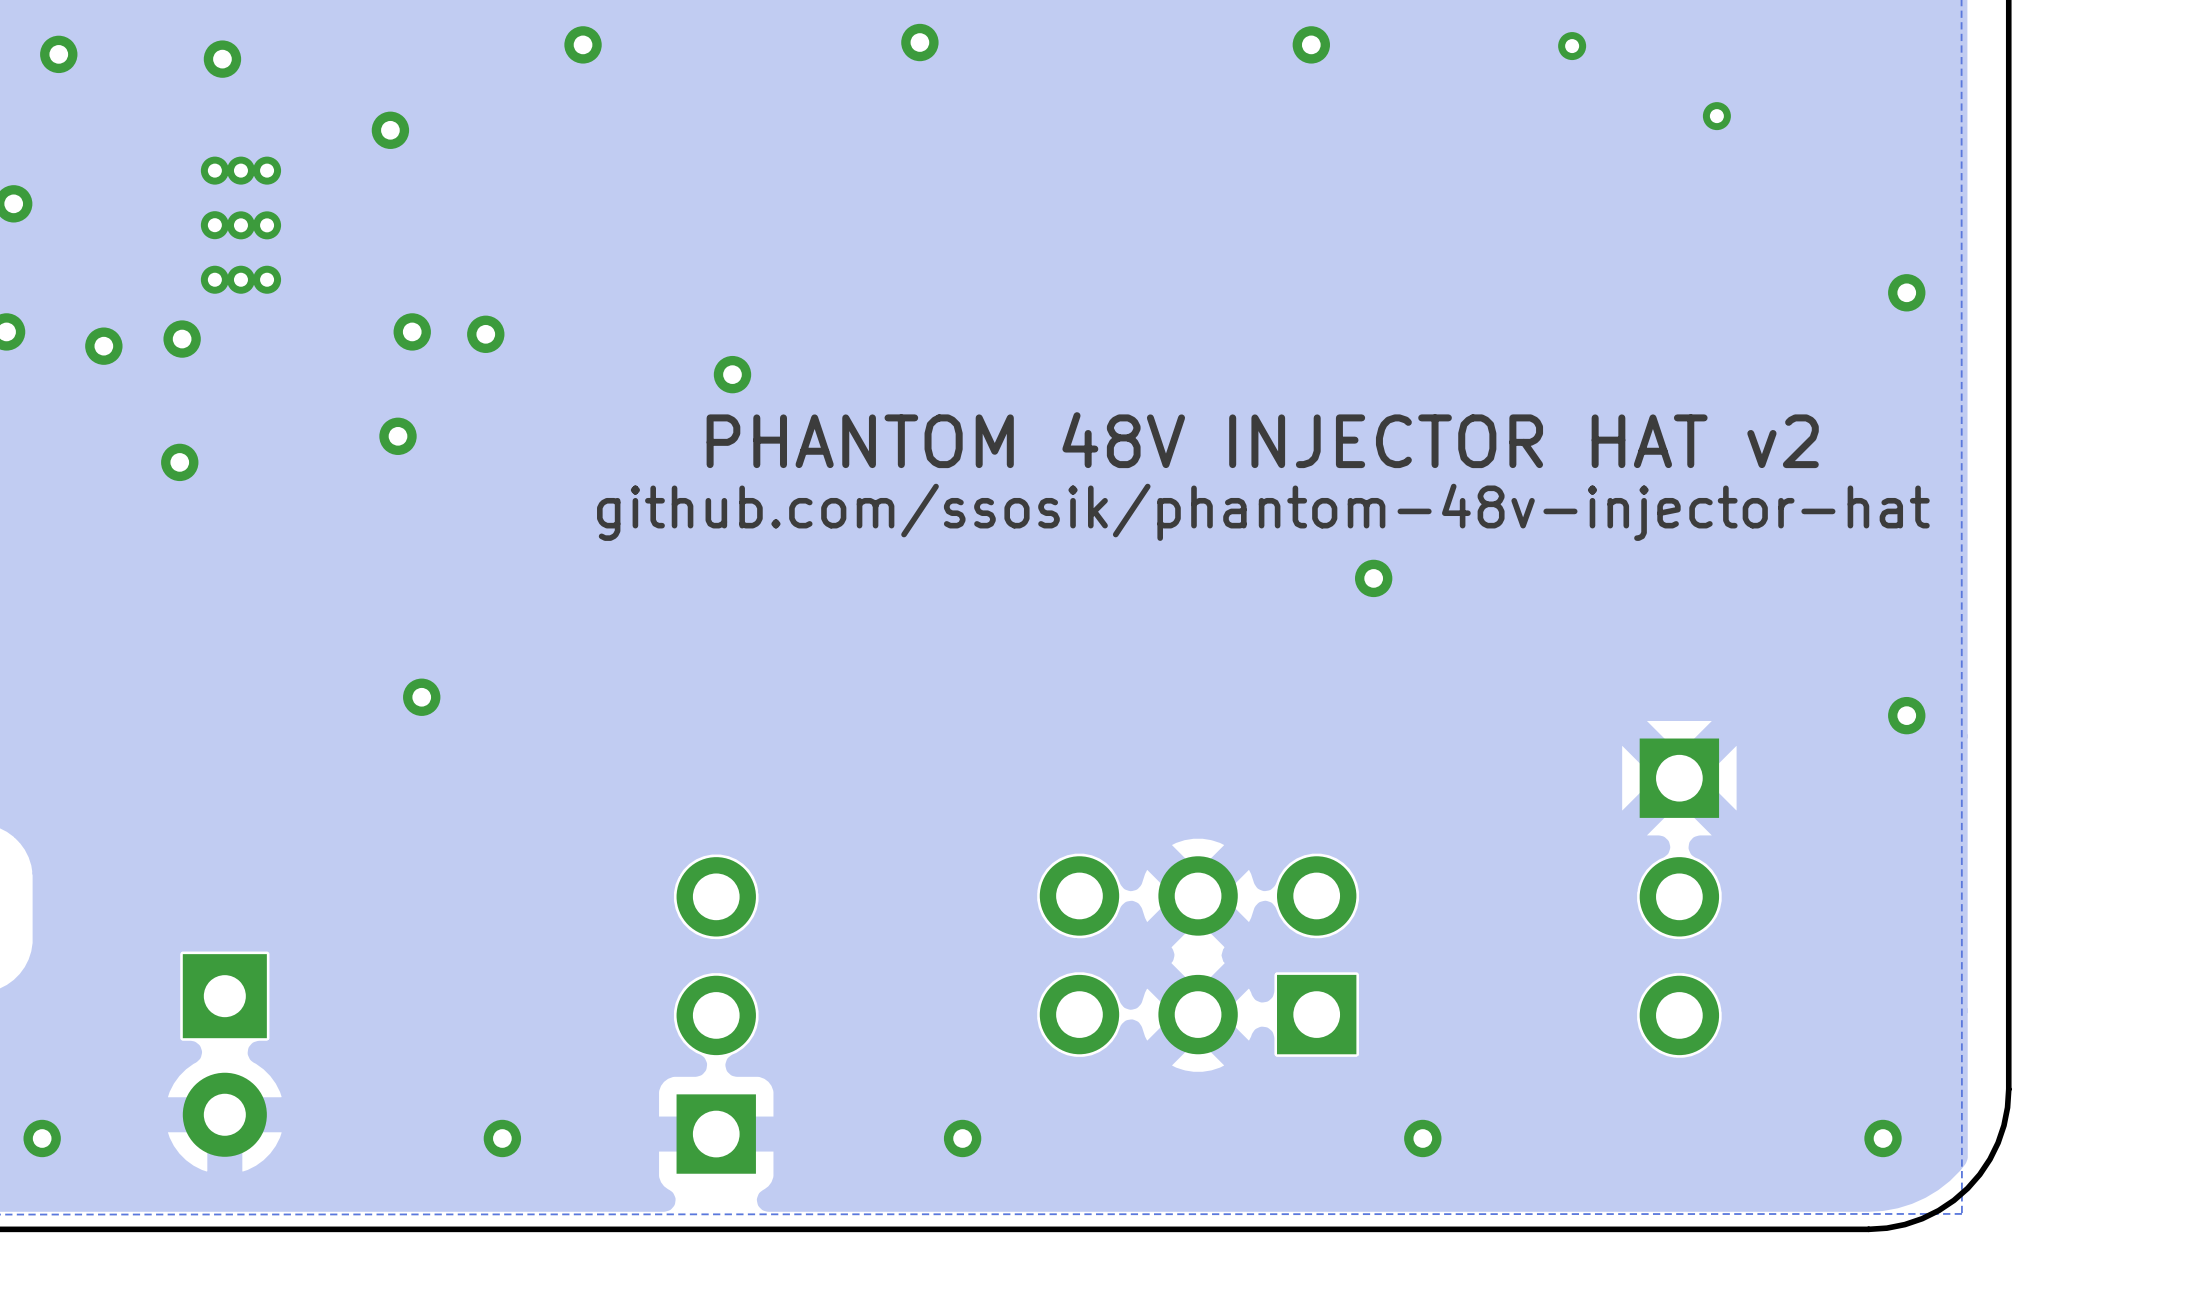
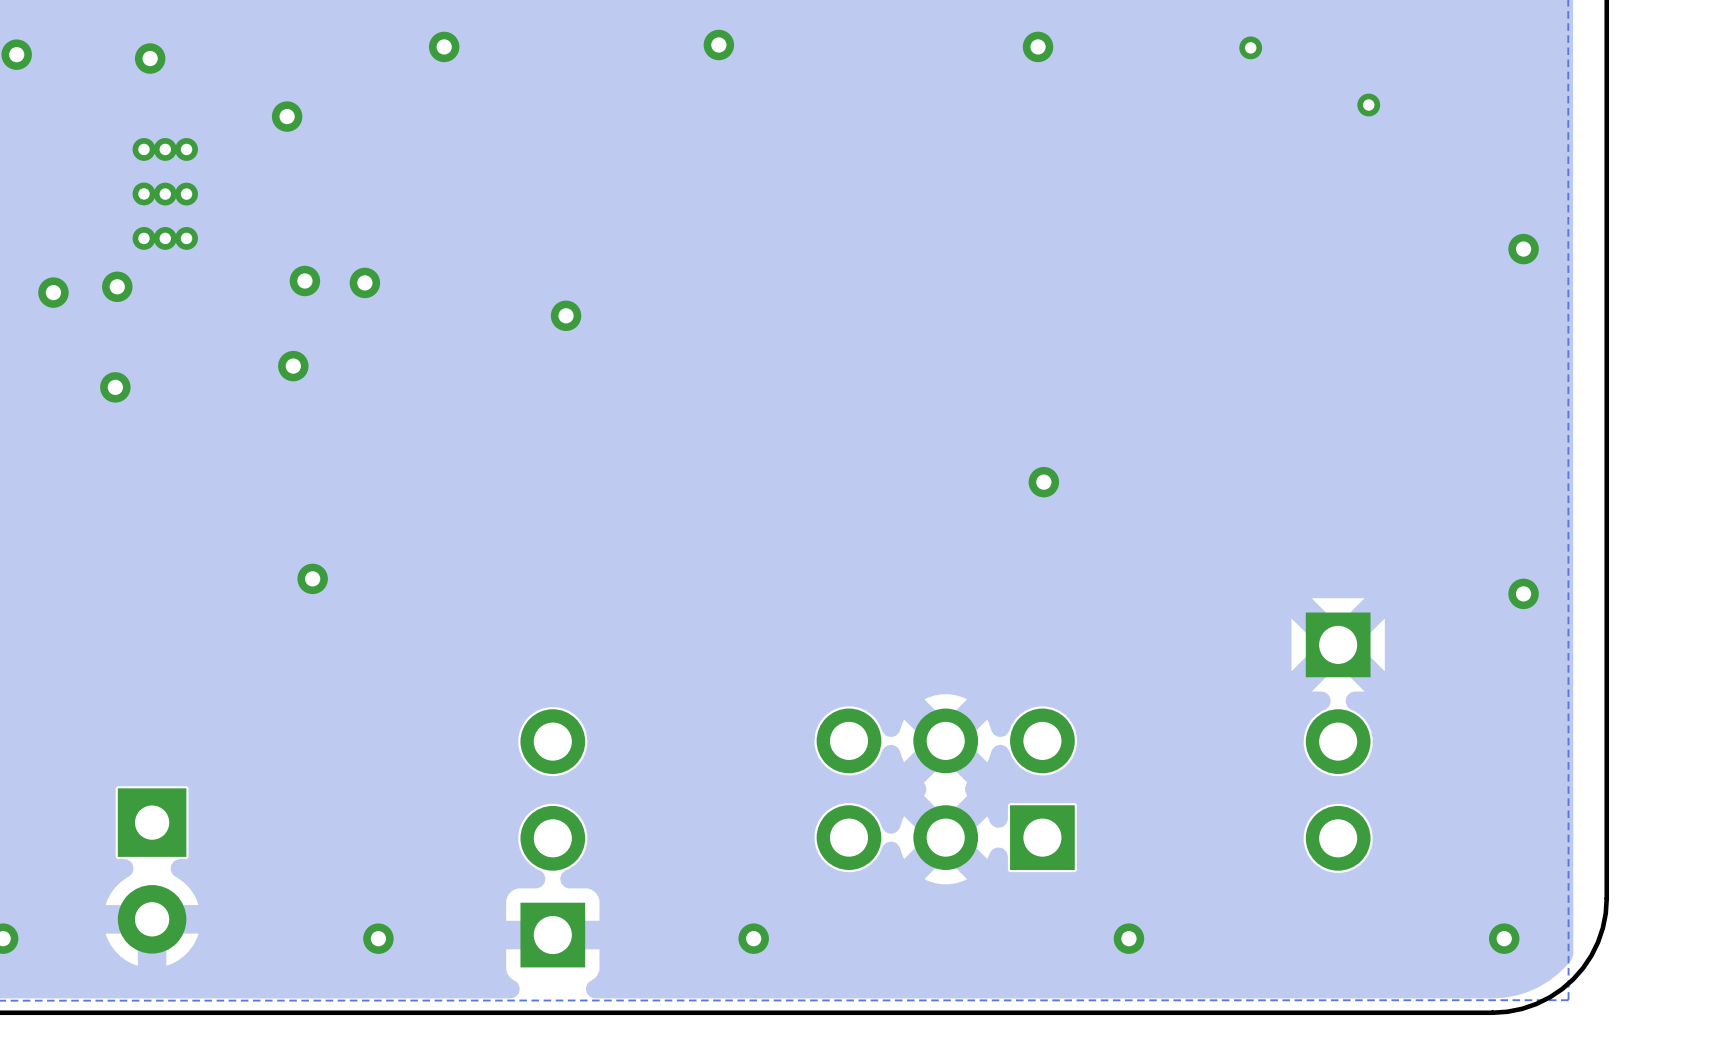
text: PHANTOM 48V INJECTOR HAT v2 (1262, 440) -> none
text: github.com/ssosik/phantom-48v-injector-hat (1263, 512) -> none
via position: (1373, 578) -> (1043, 482)

